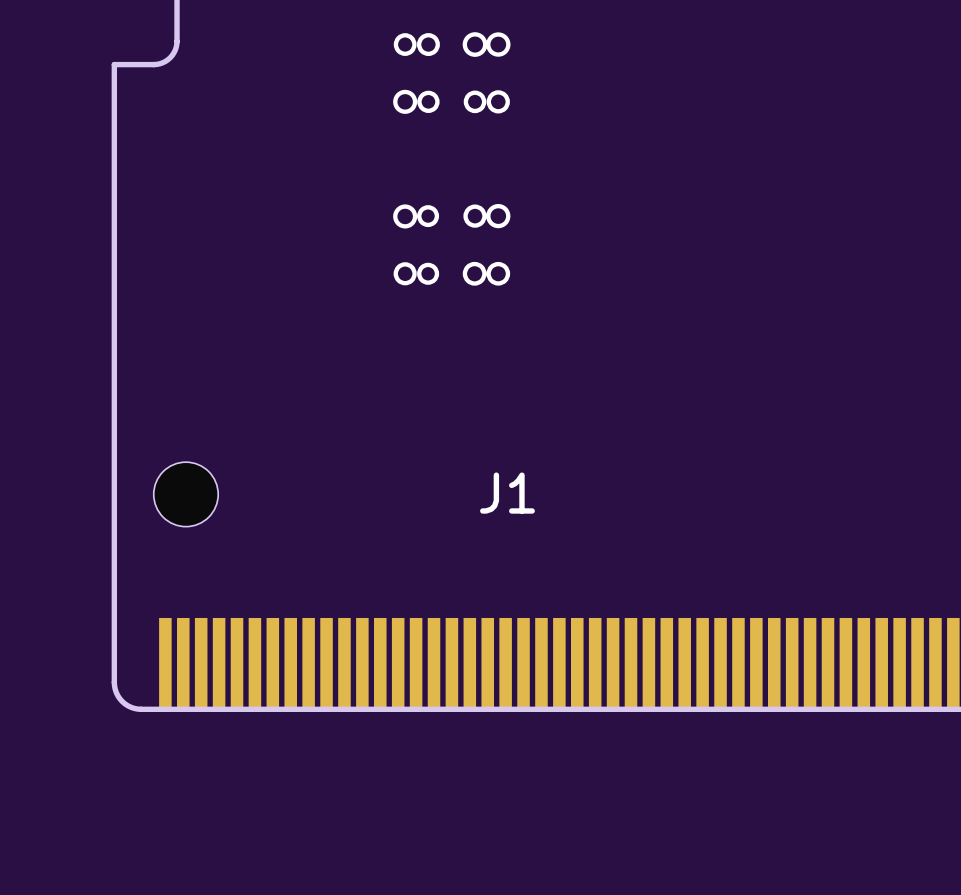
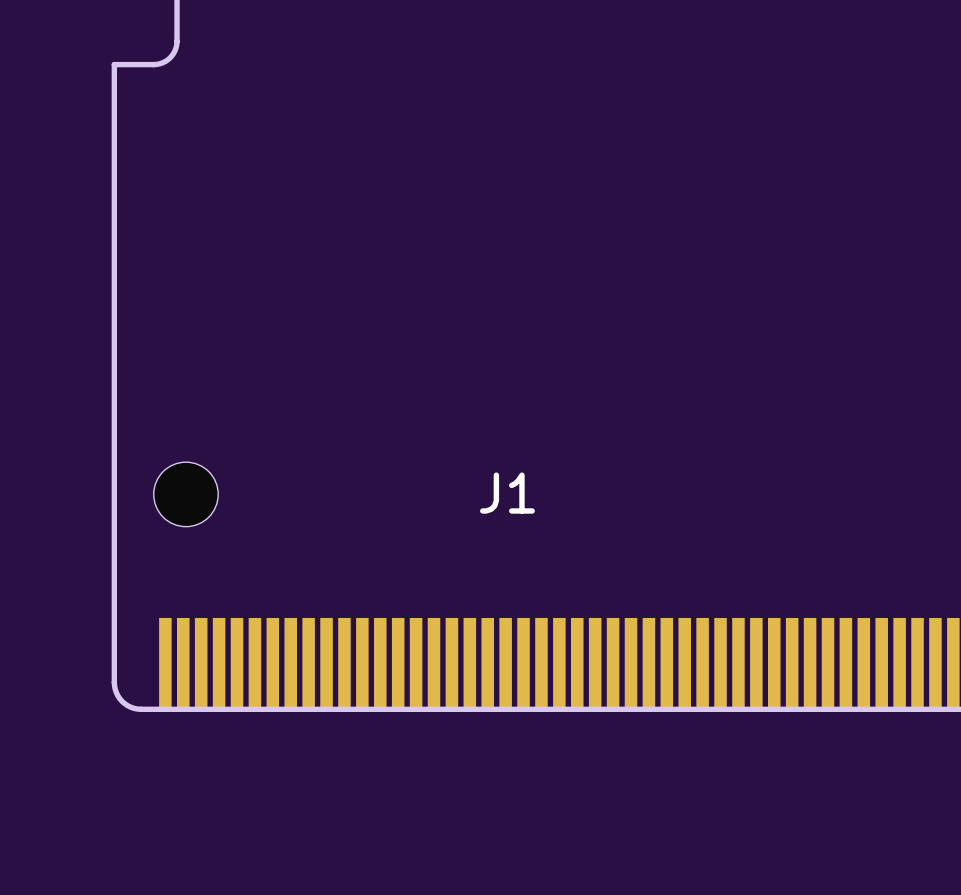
drawing: [393, 32, 511, 114] -> none
drawing: [393, 204, 511, 286] -> none

